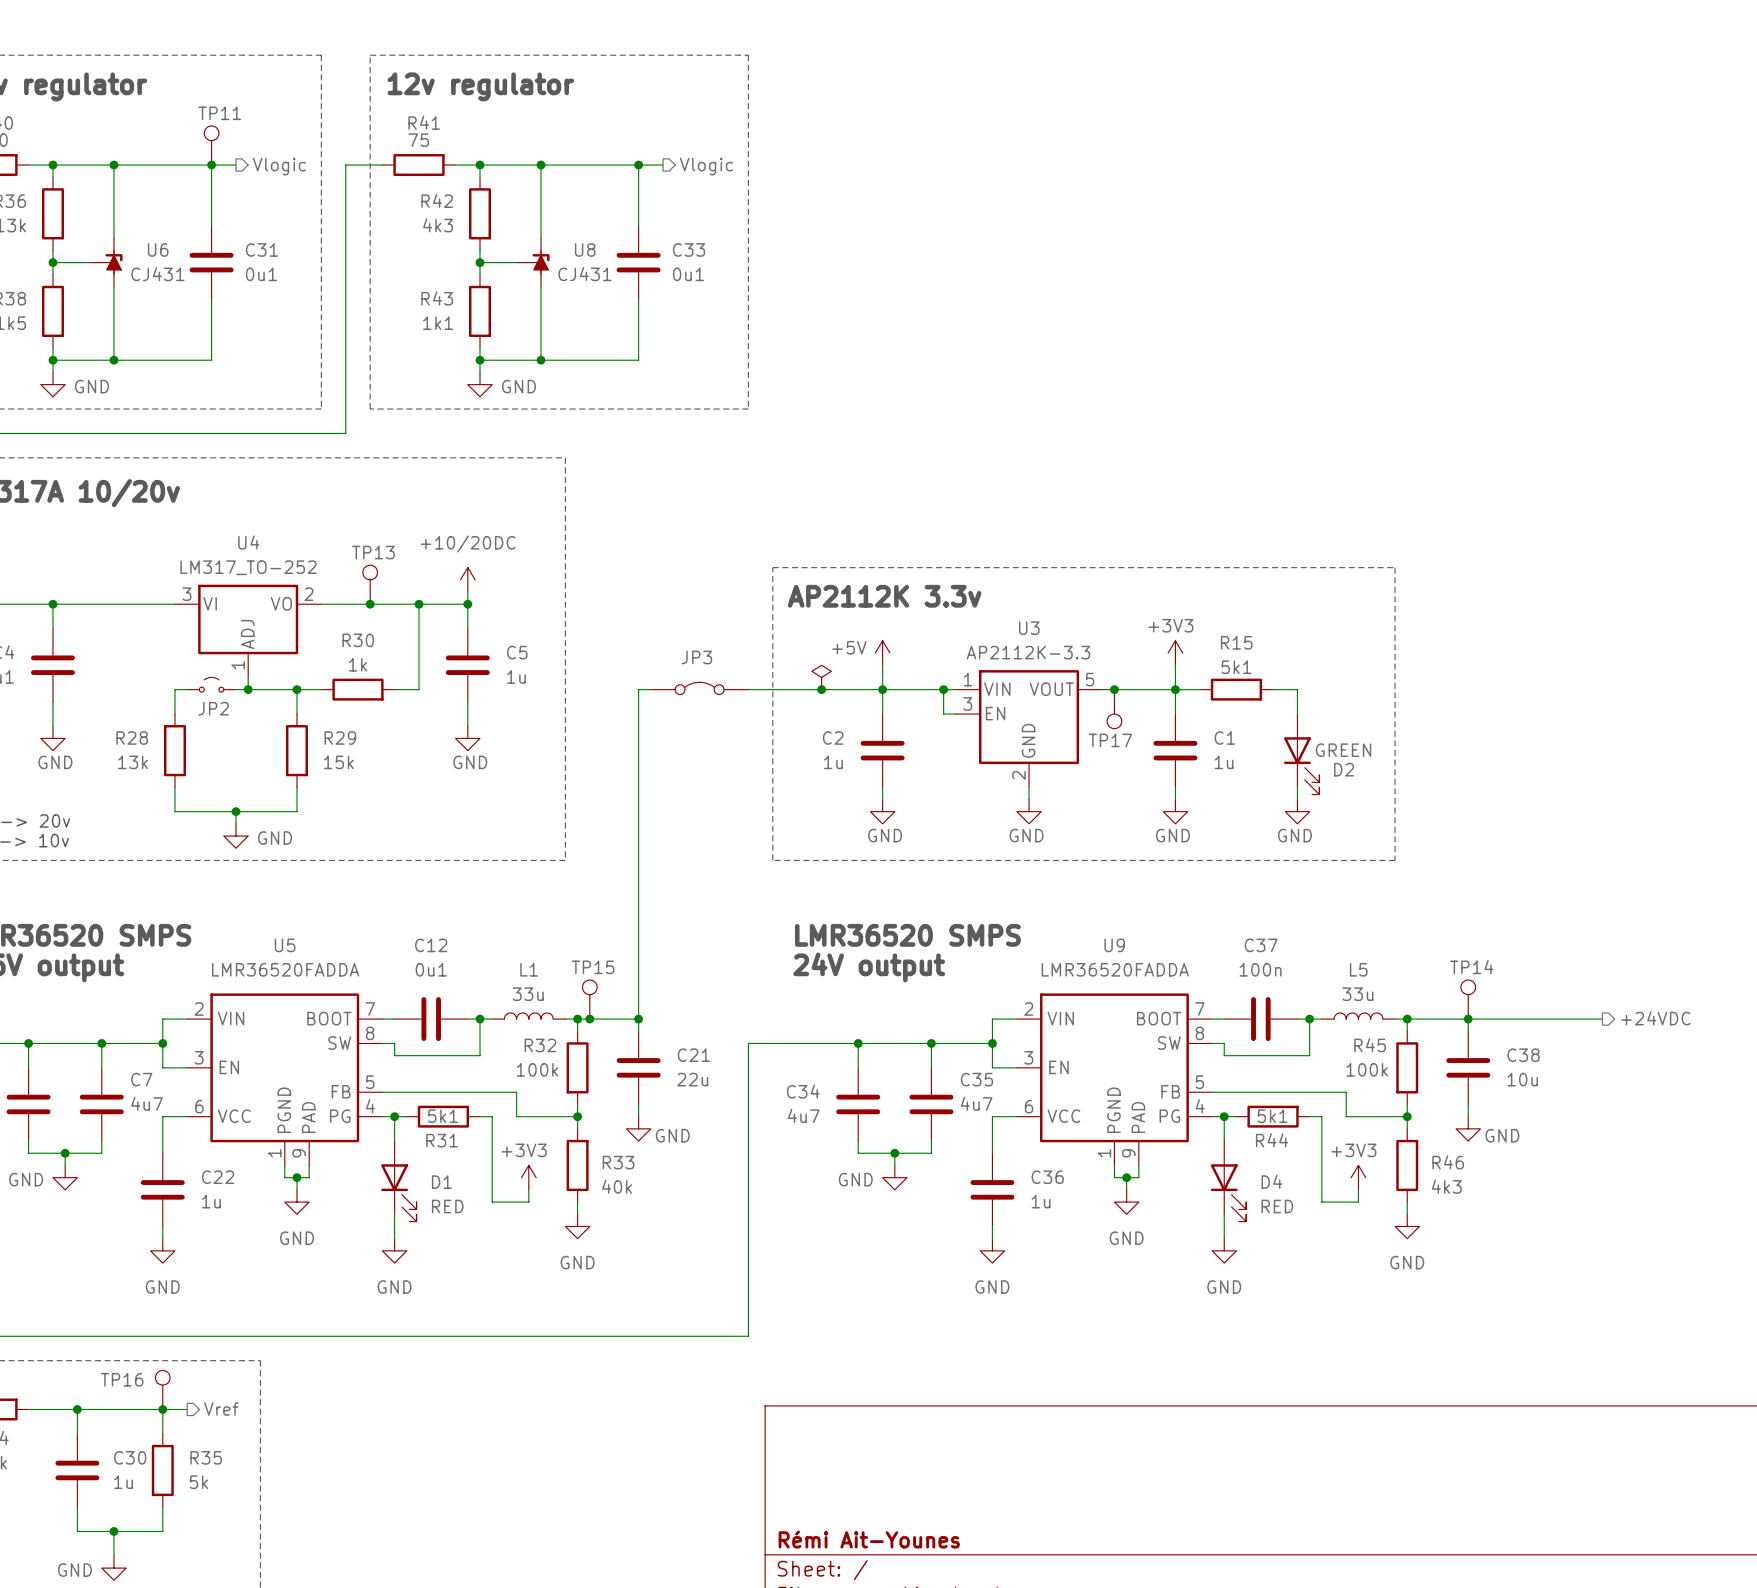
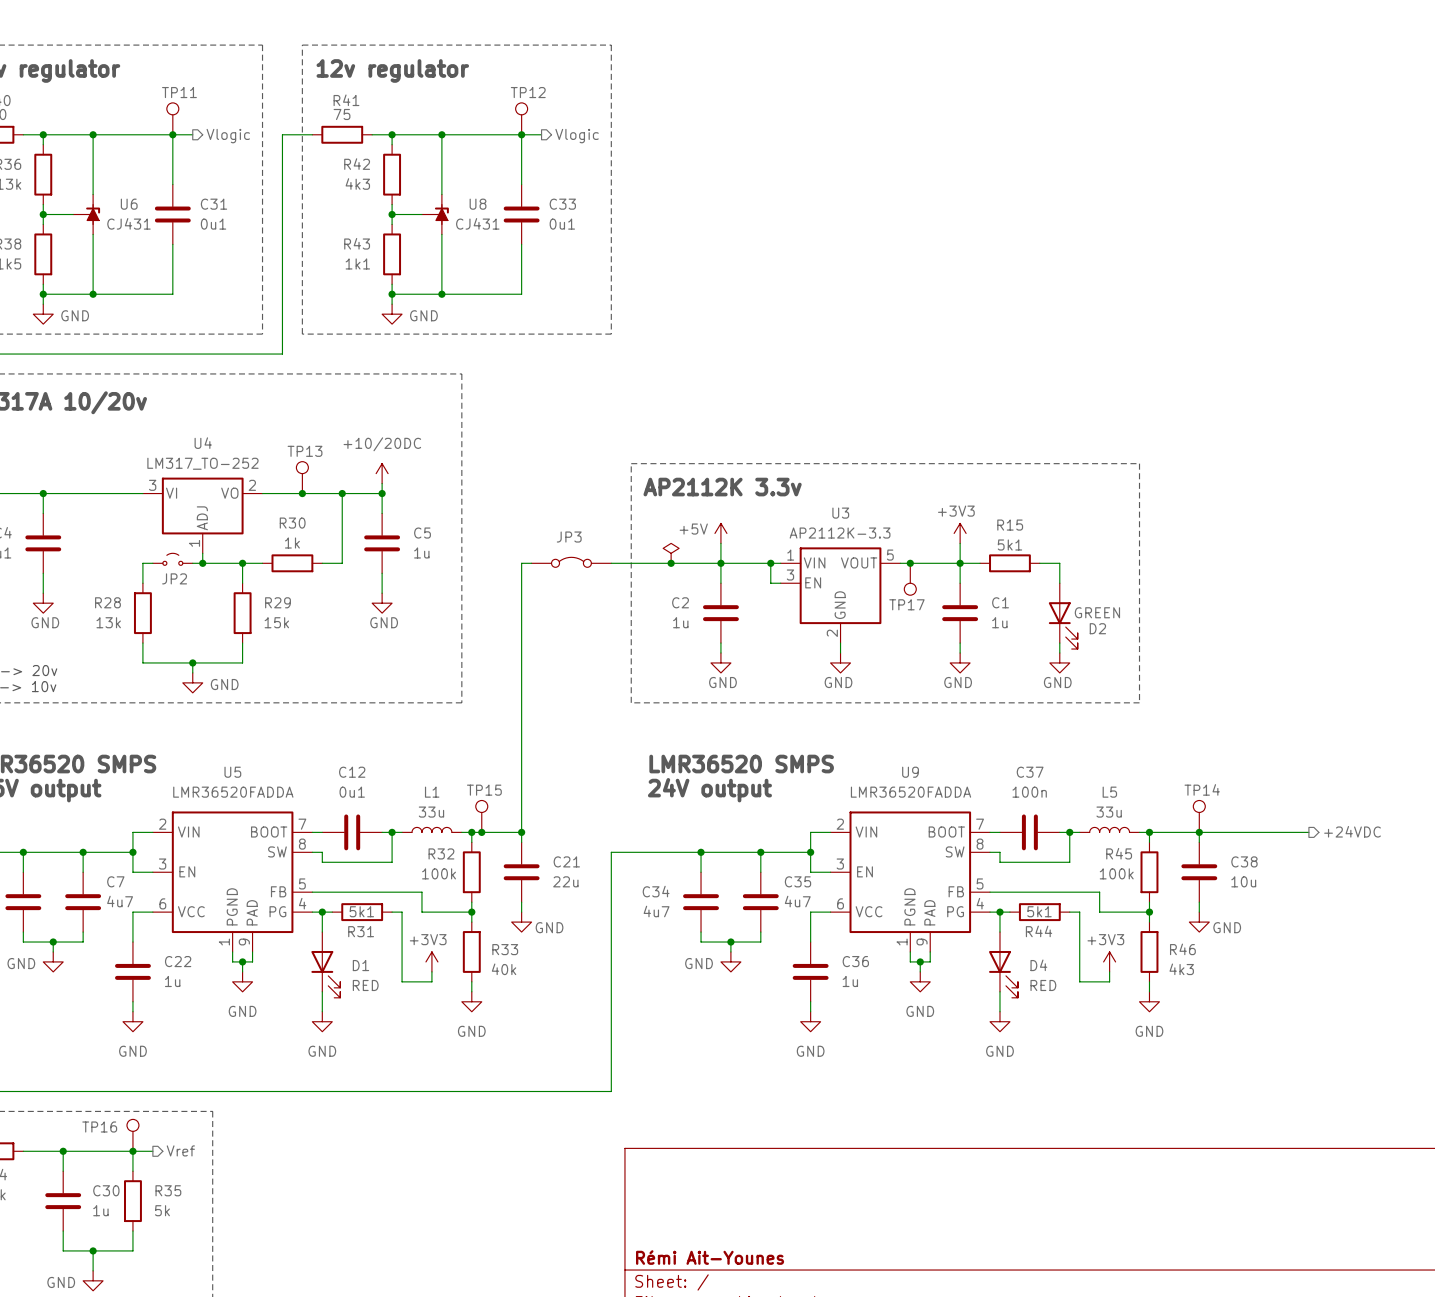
TP12: none -> (521, 118)

